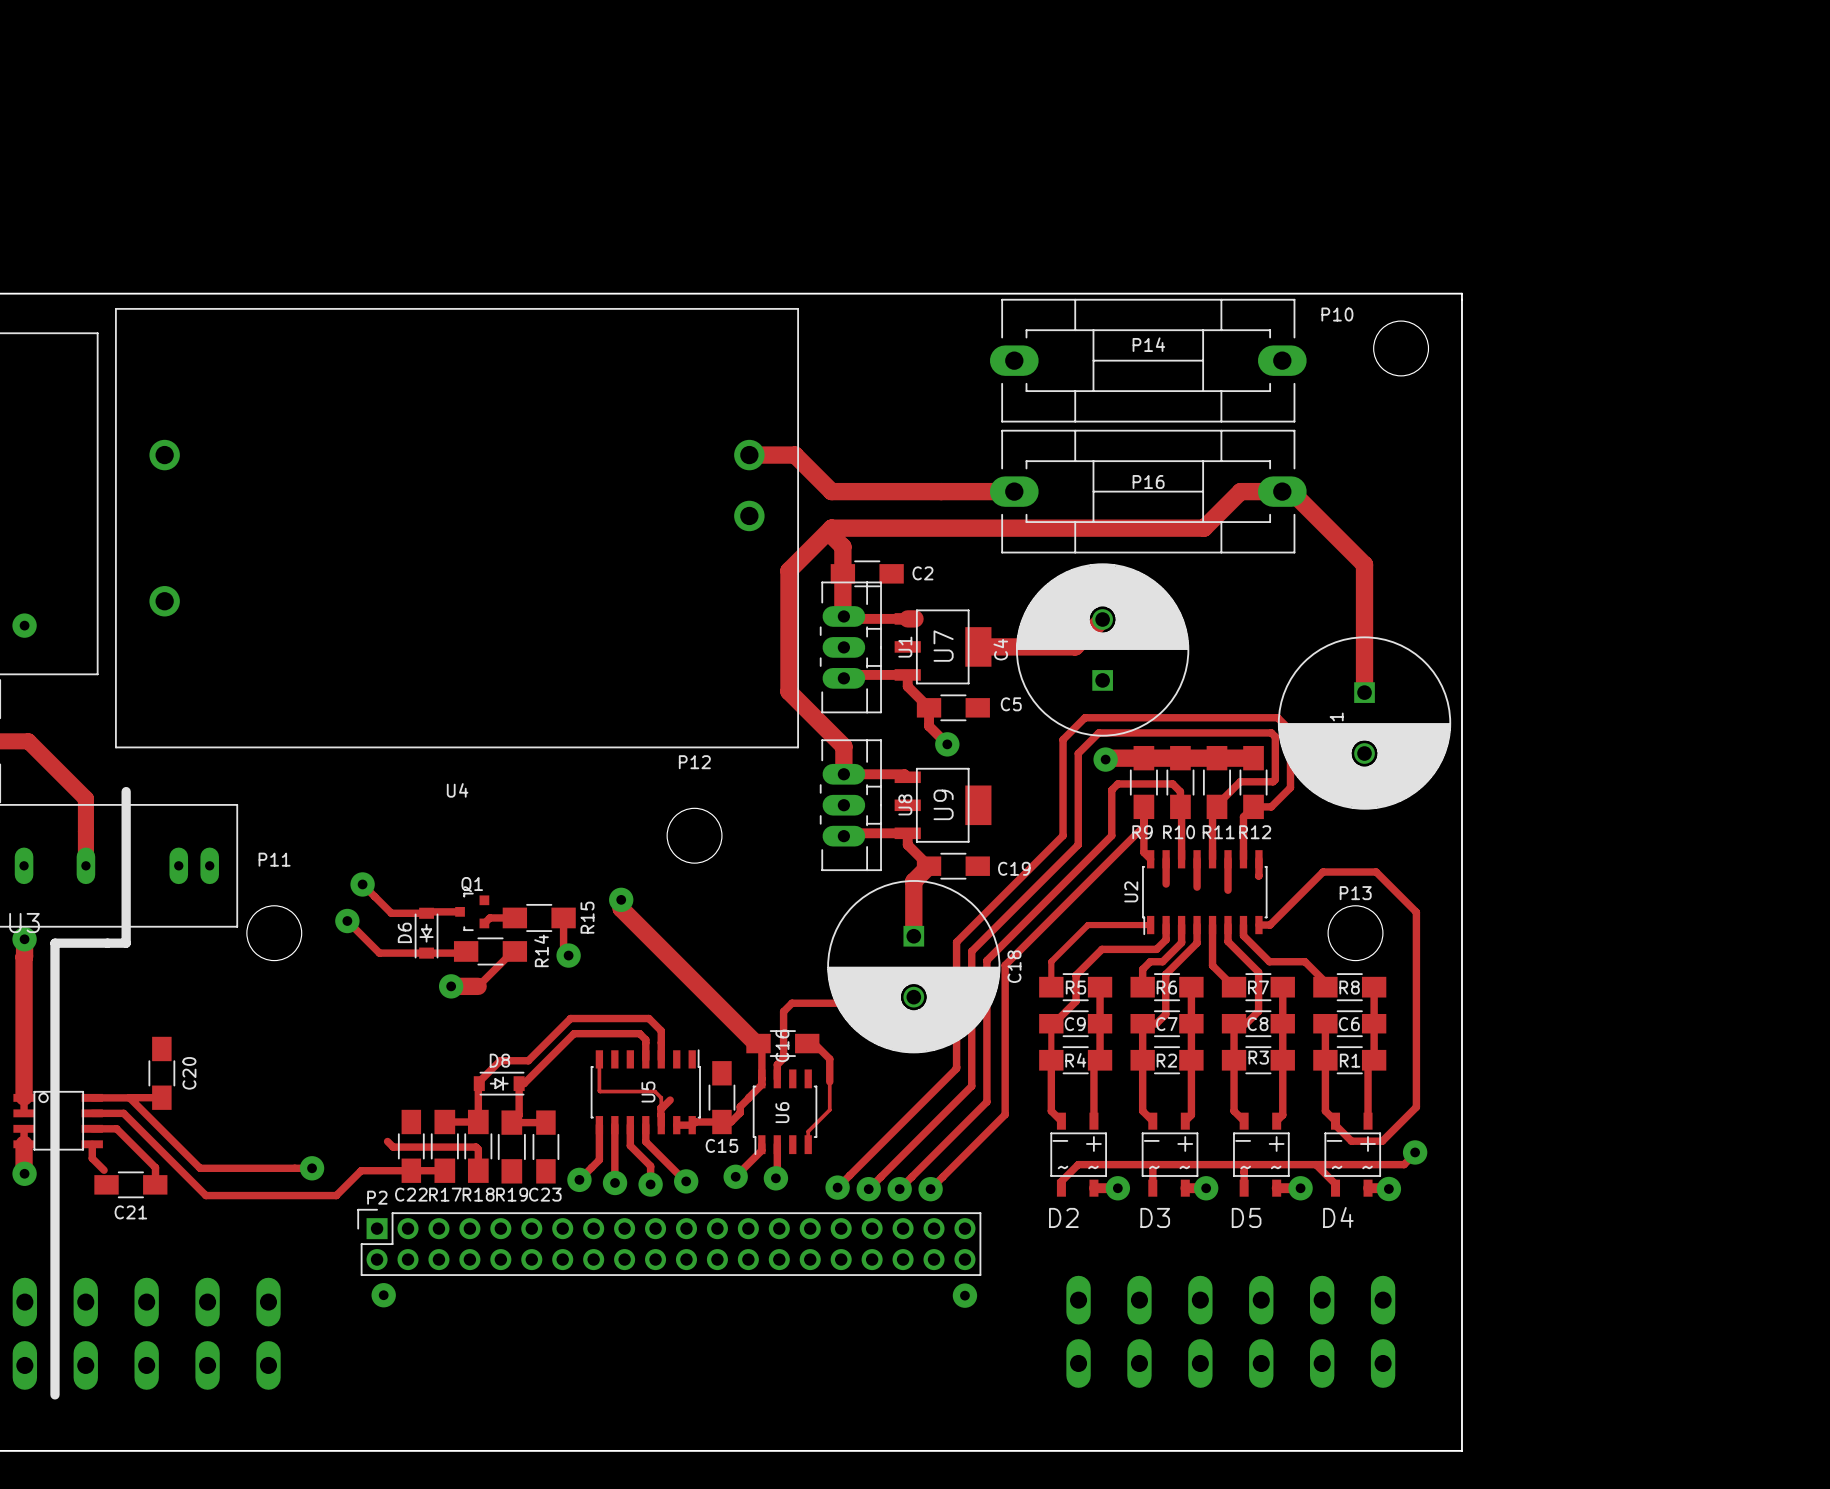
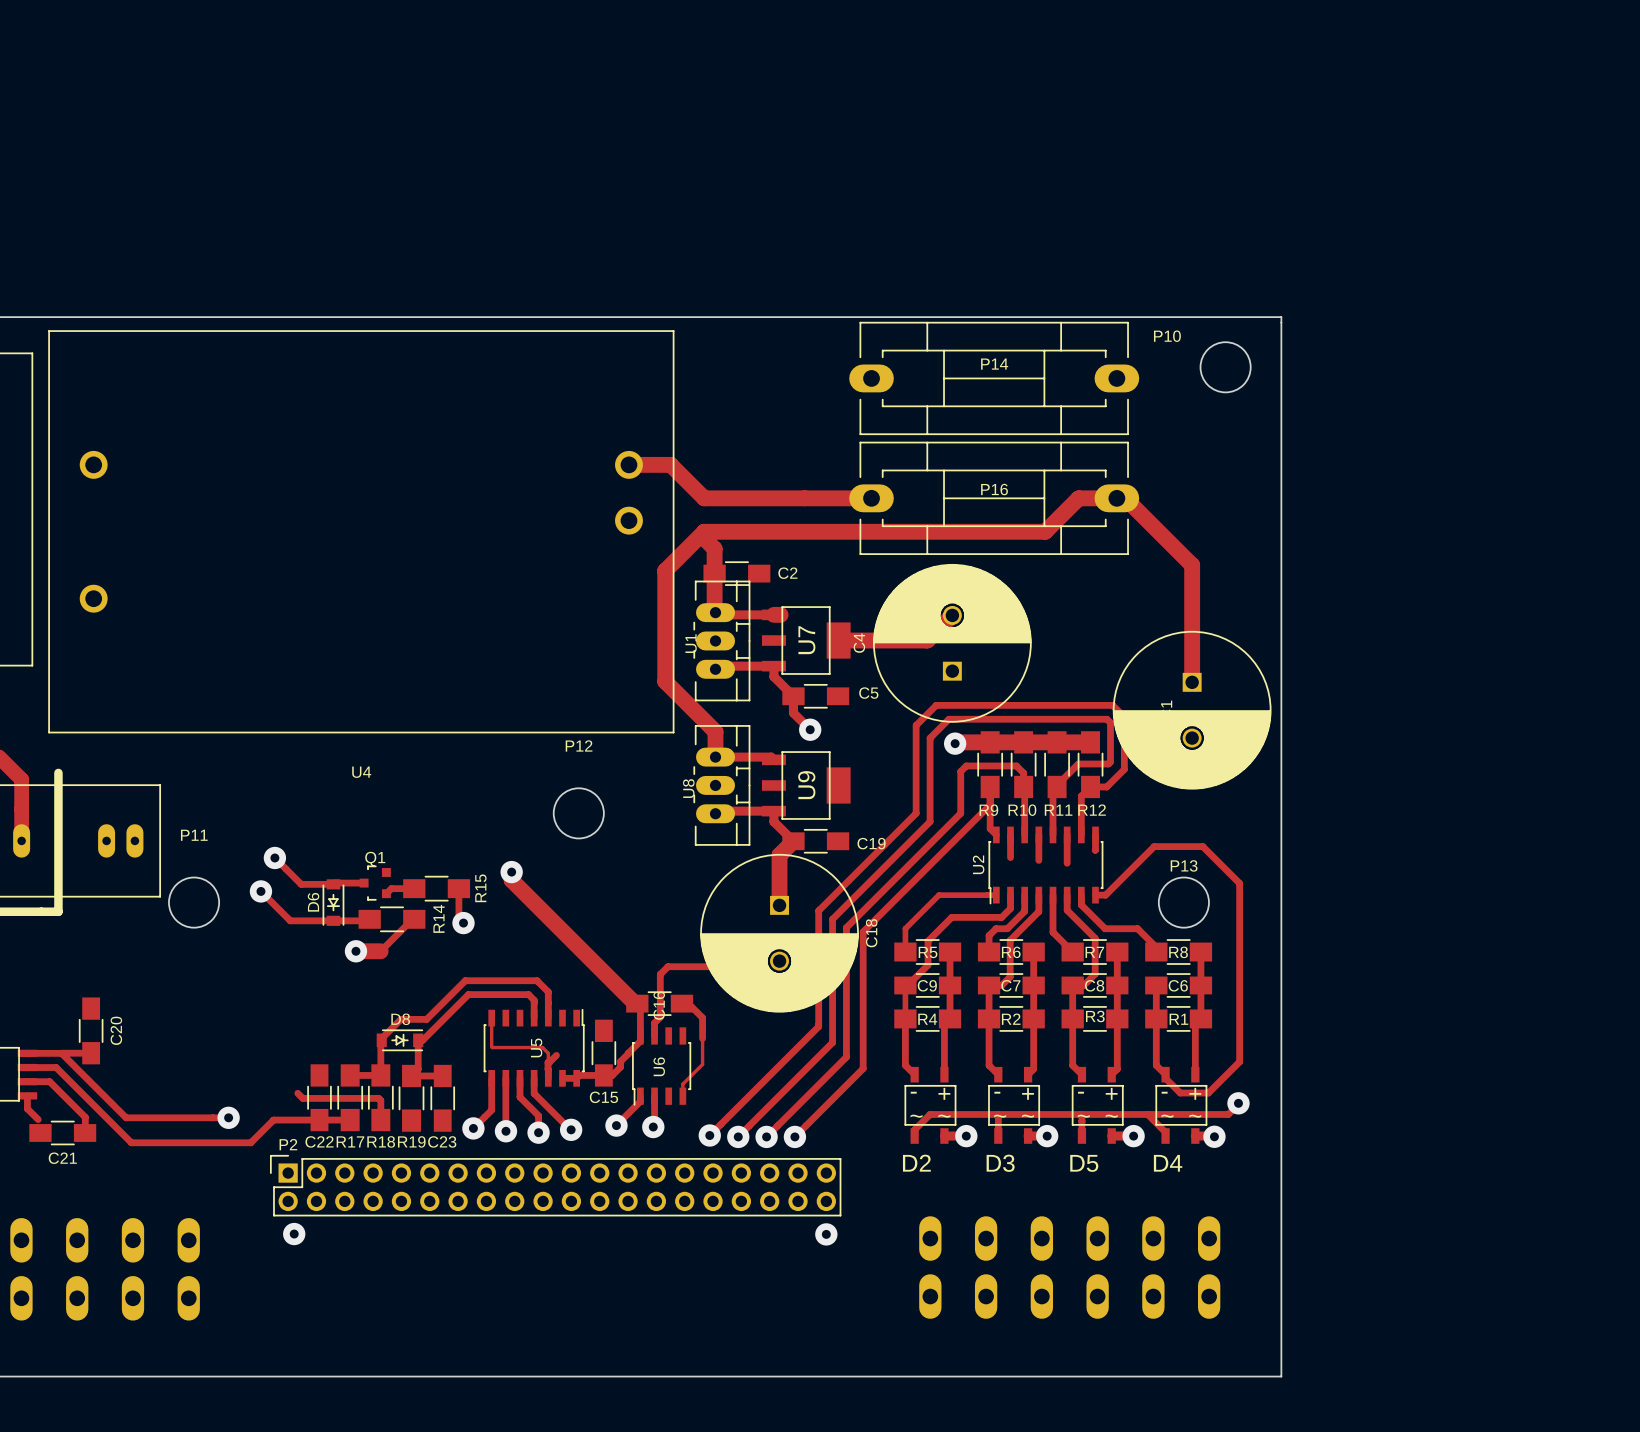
U1 name position: U1 (905, 647) -> U1 (691, 643)
U8 name position: U8 (905, 804) -> U8 (688, 788)

